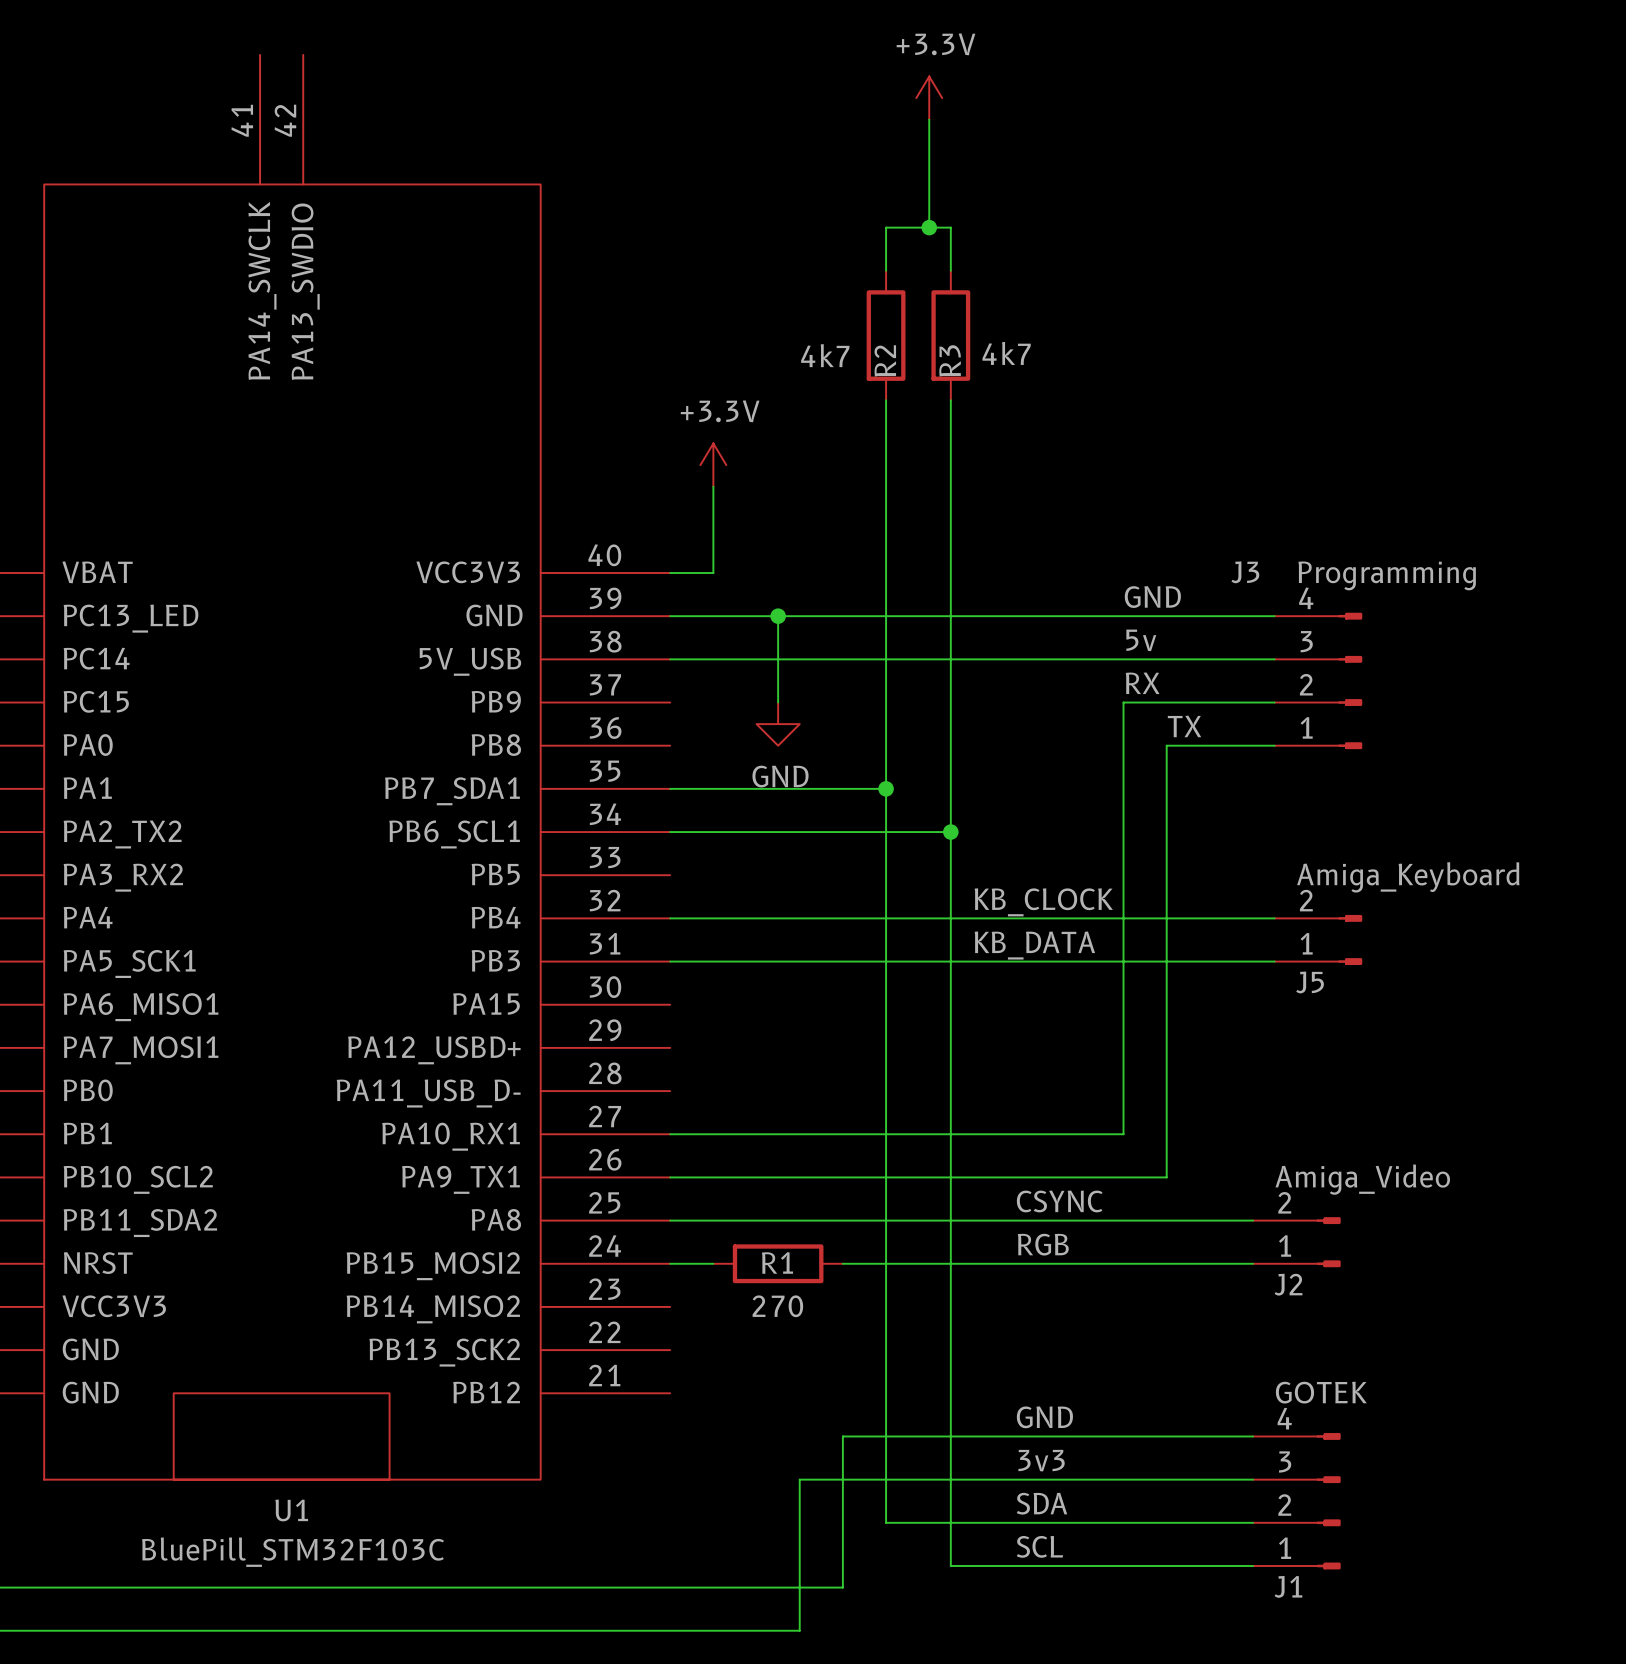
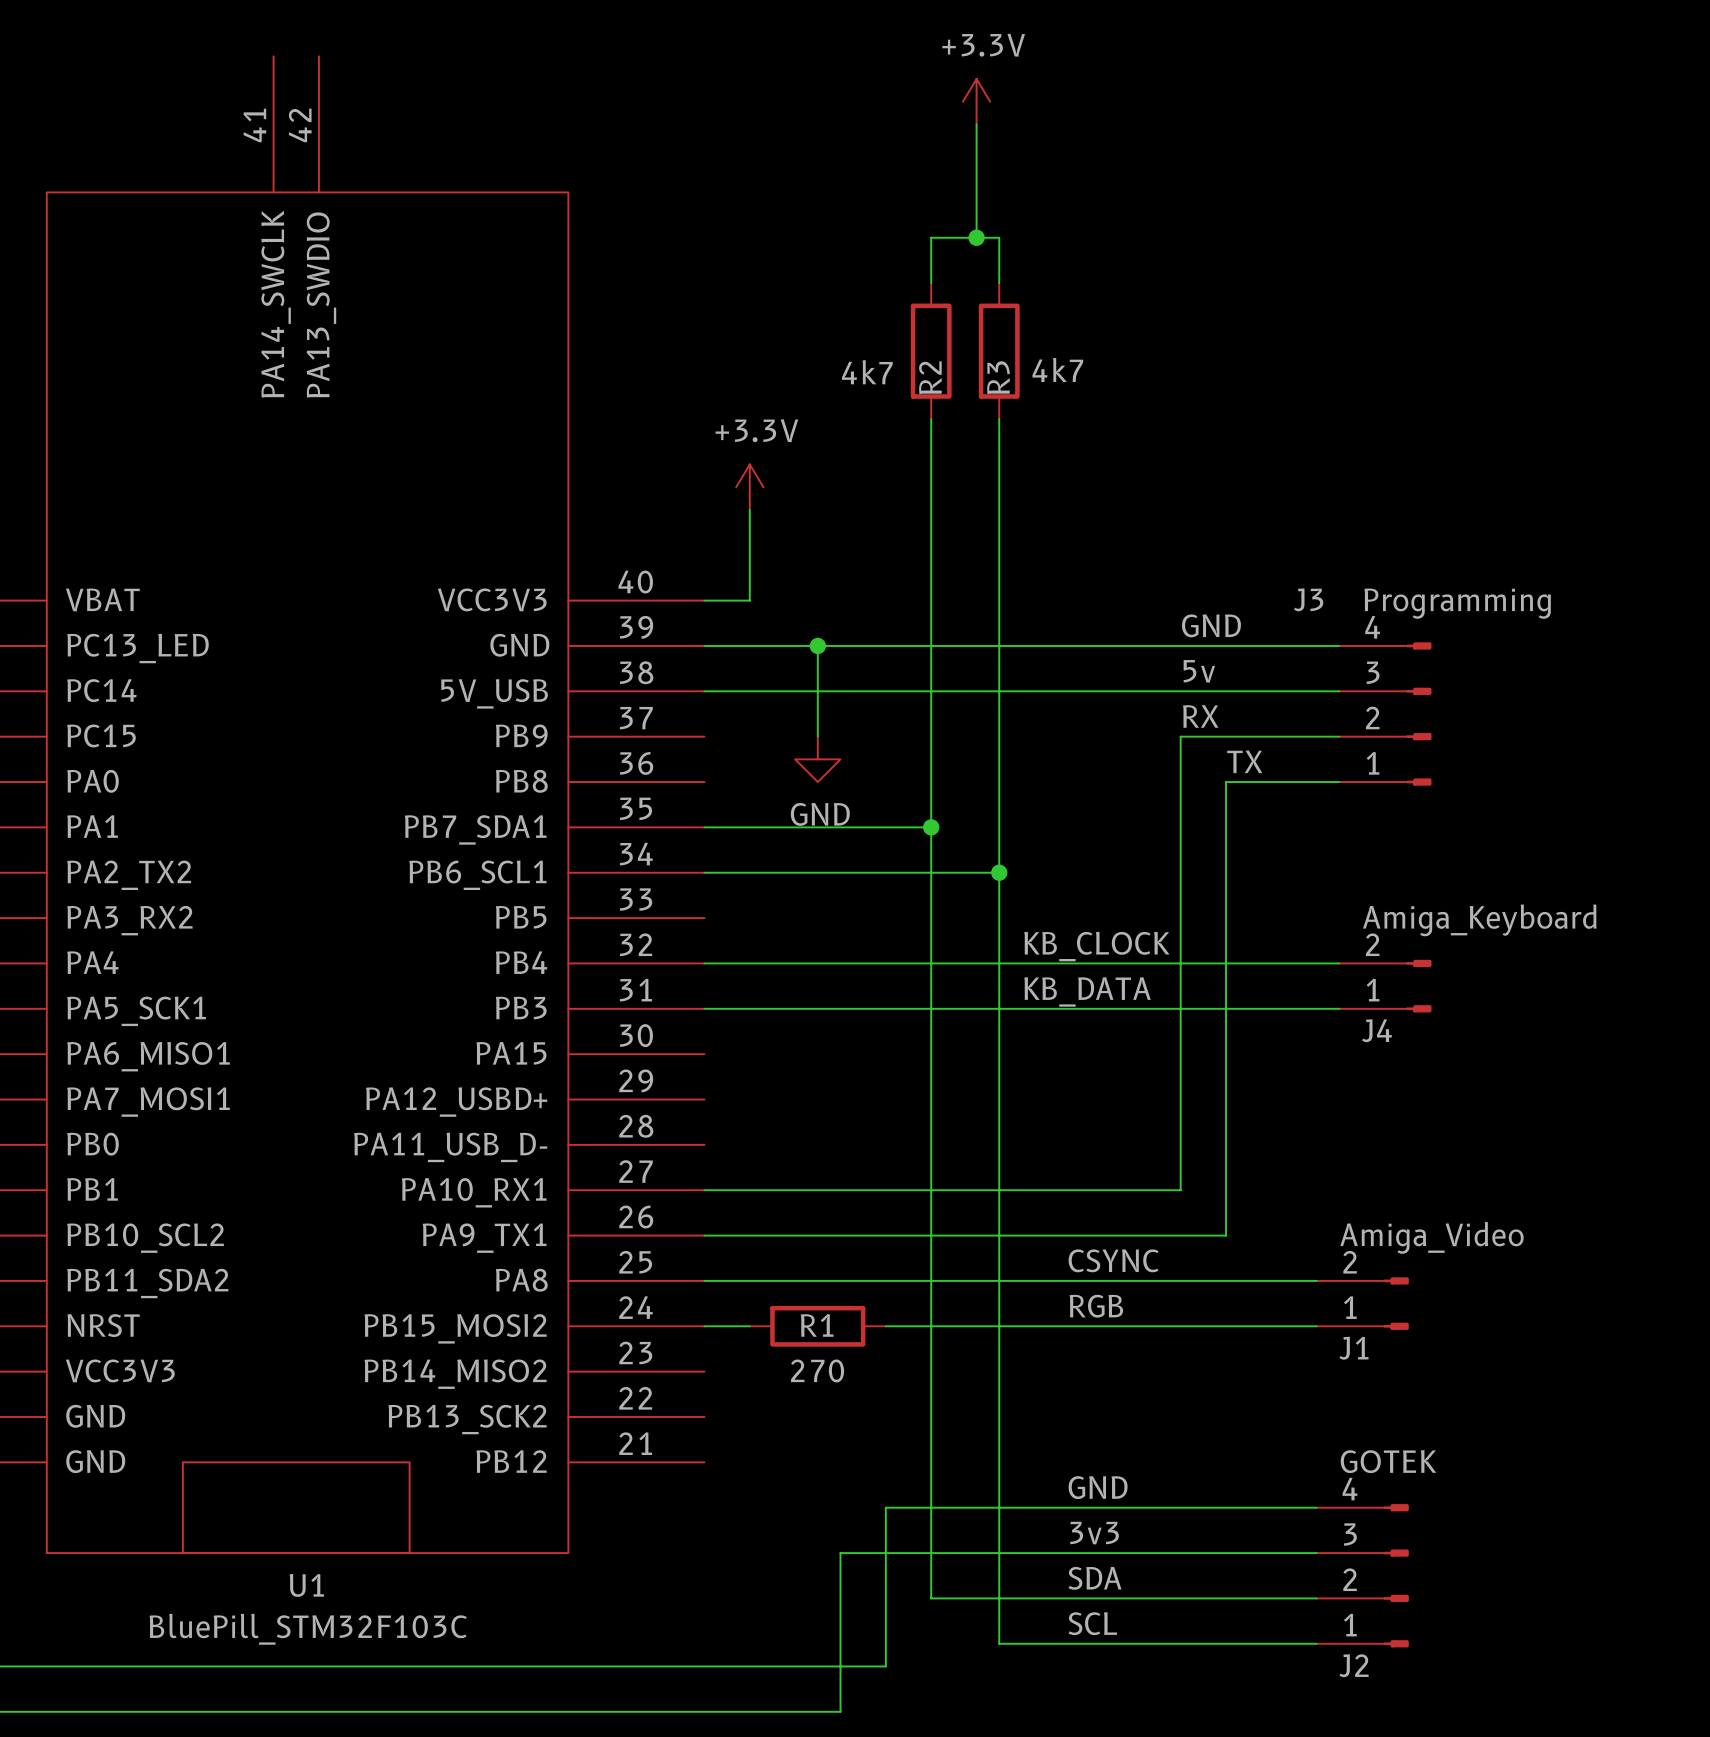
J5 name: J5 (1310, 982) -> J4 (1377, 1030)
J2 name: J2 (1288, 1284) -> J1 (1353, 1348)
J1 name: J1 (1288, 1586) -> J2 (1354, 1665)

